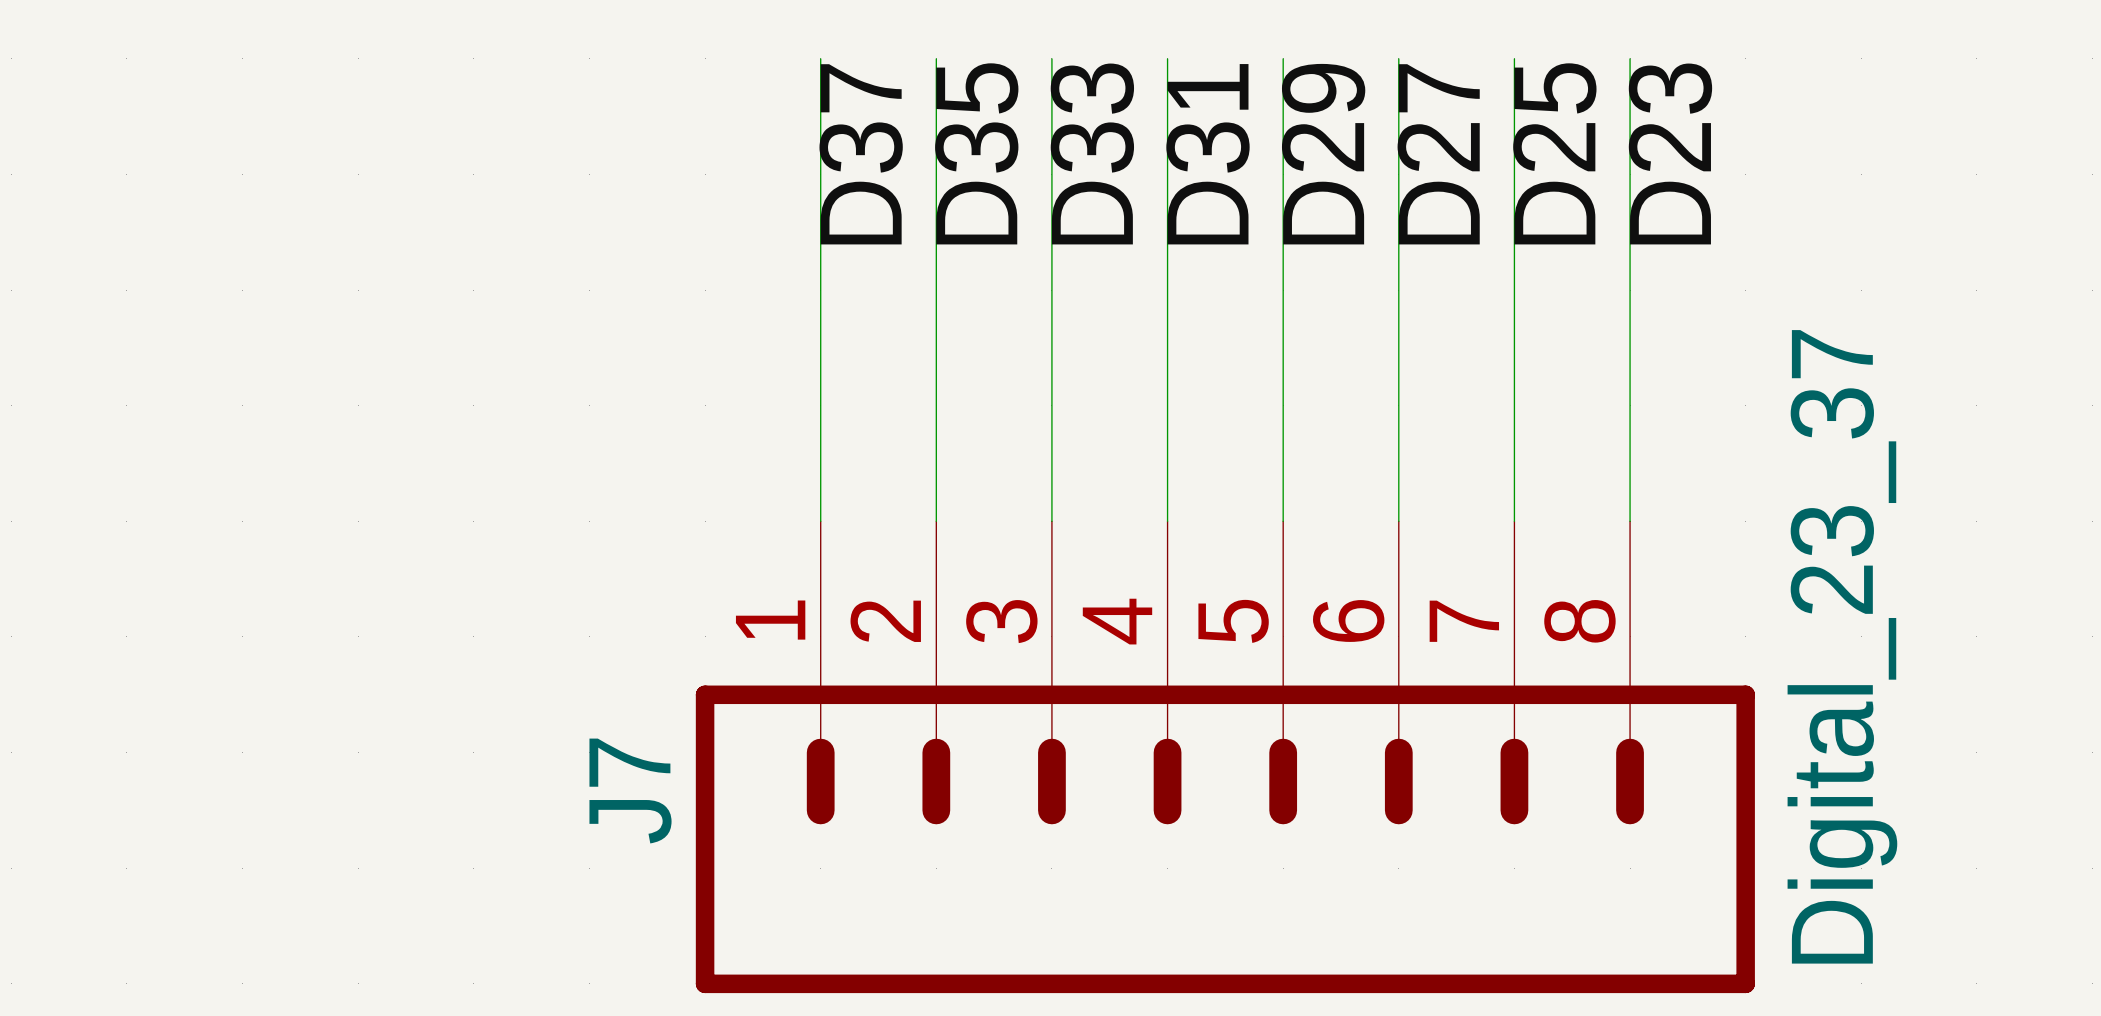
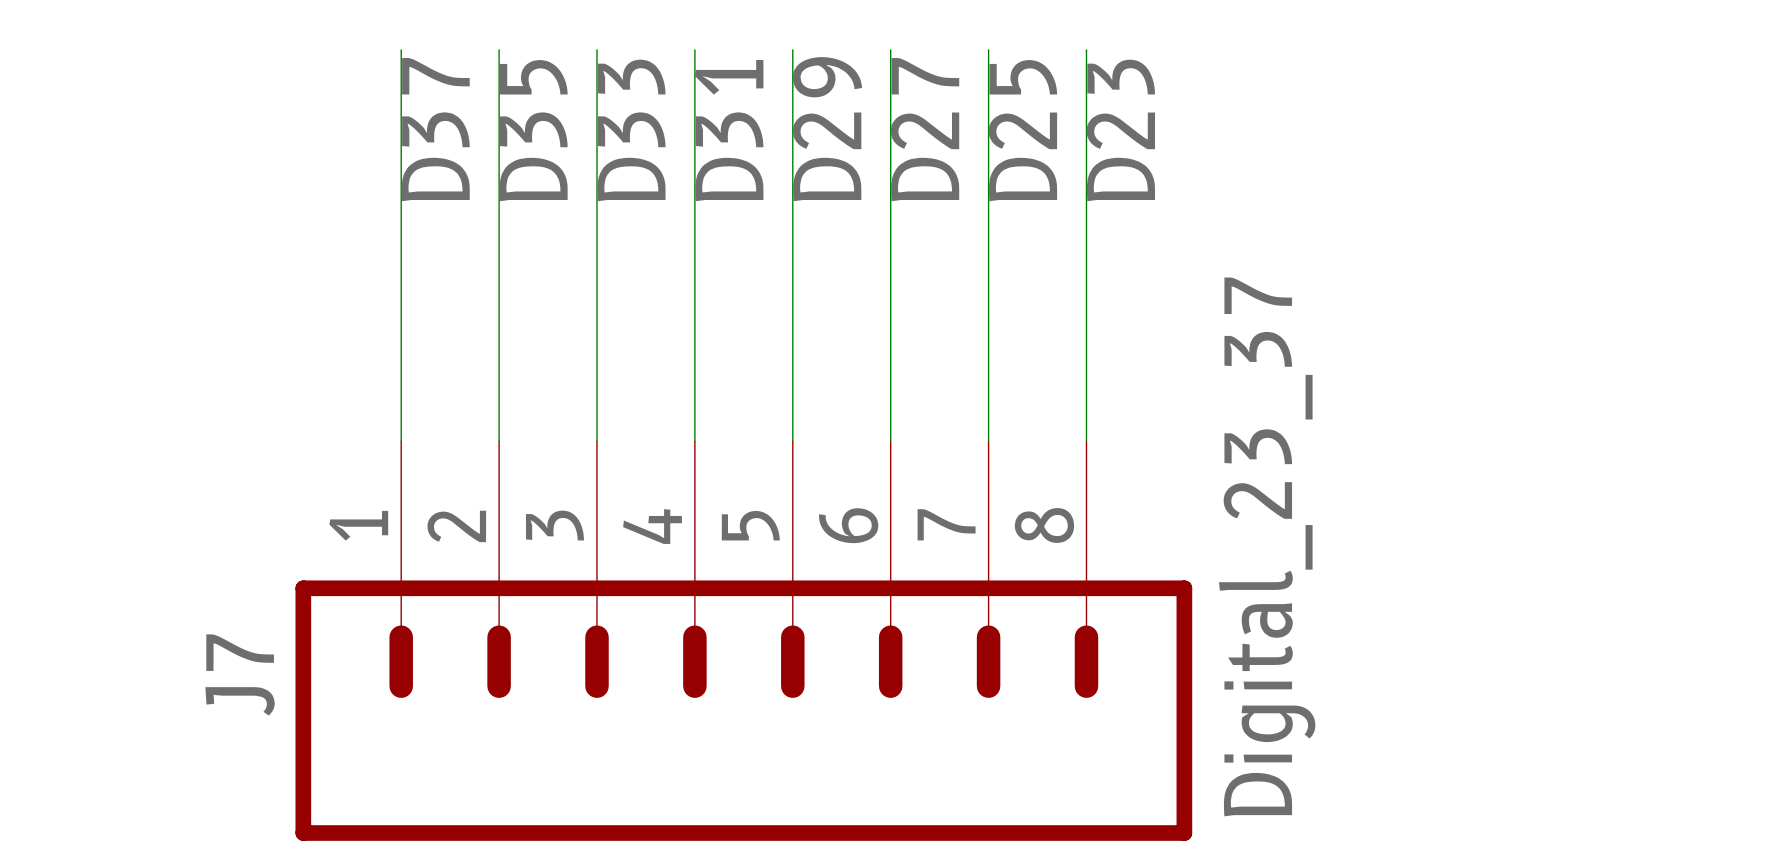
wire: (1398, 58) (1398, 521) -> (401, 49) (401, 441)
wire: (1514, 58) (1514, 521) -> (499, 49) (499, 441)
wire: (1630, 58) (1630, 521) -> (597, 49) (597, 441)
label: none -> D35 (533, 130)
label: none -> D33 (631, 130)
label: D35 (976, 153) -> D29 (827, 129)
label: D33 (1092, 153) -> D27 (925, 129)
label: D25 (1554, 153) -> none
label: D23 (1670, 153) -> none
label: none -> D37 (435, 129)
label: D37 (861, 154) -> D31 (729, 130)
label: D31 (1208, 154) -> D25 (1022, 130)
label: D29 (1323, 154) -> D23 (1120, 130)
label: D27 (1438, 154) -> none
J7 position: (1225, 757) -> (743, 641)

